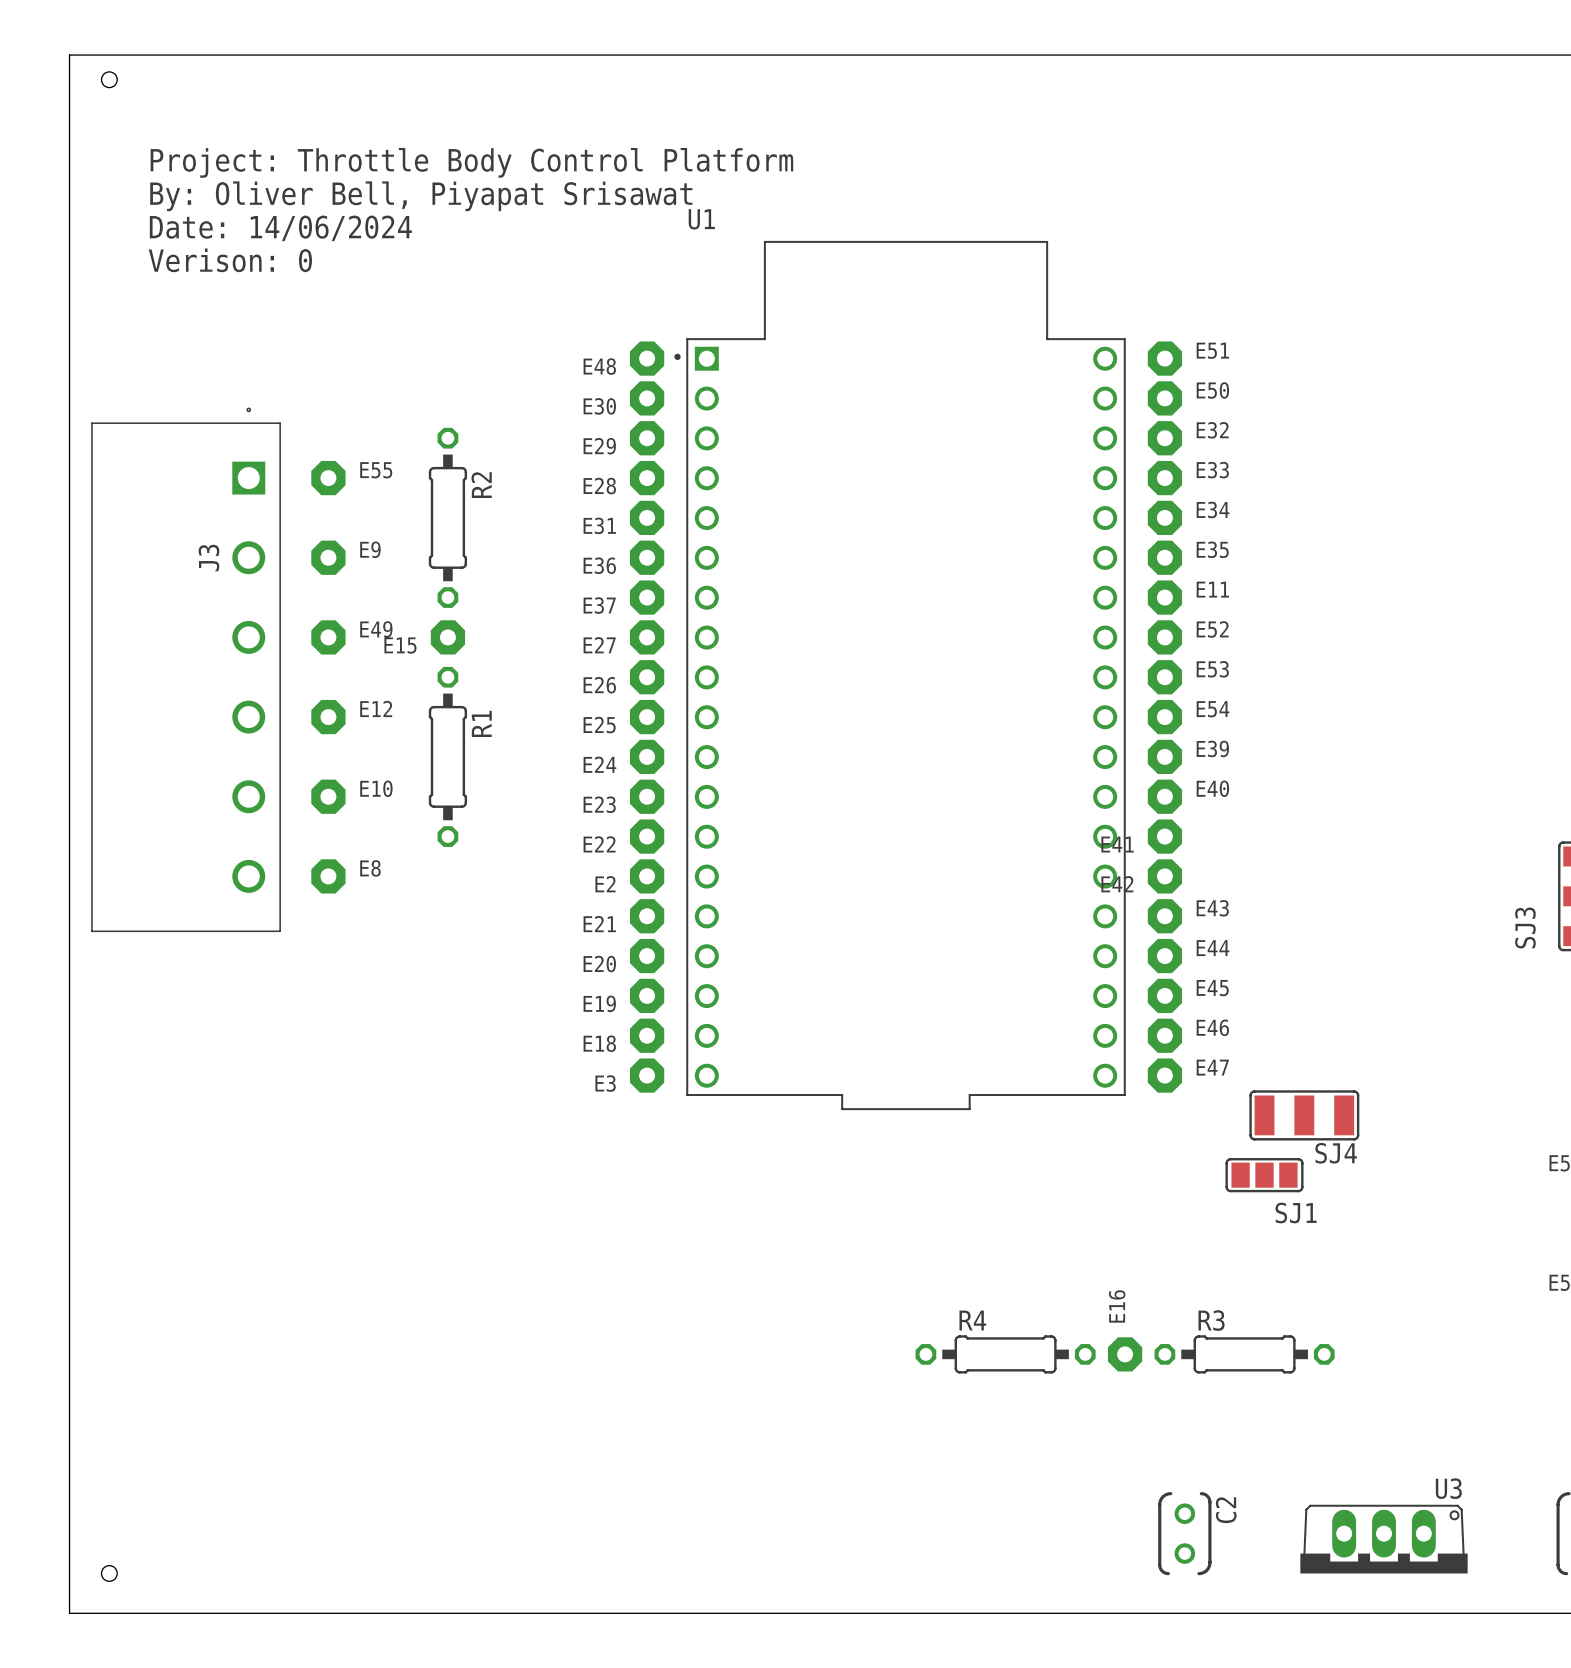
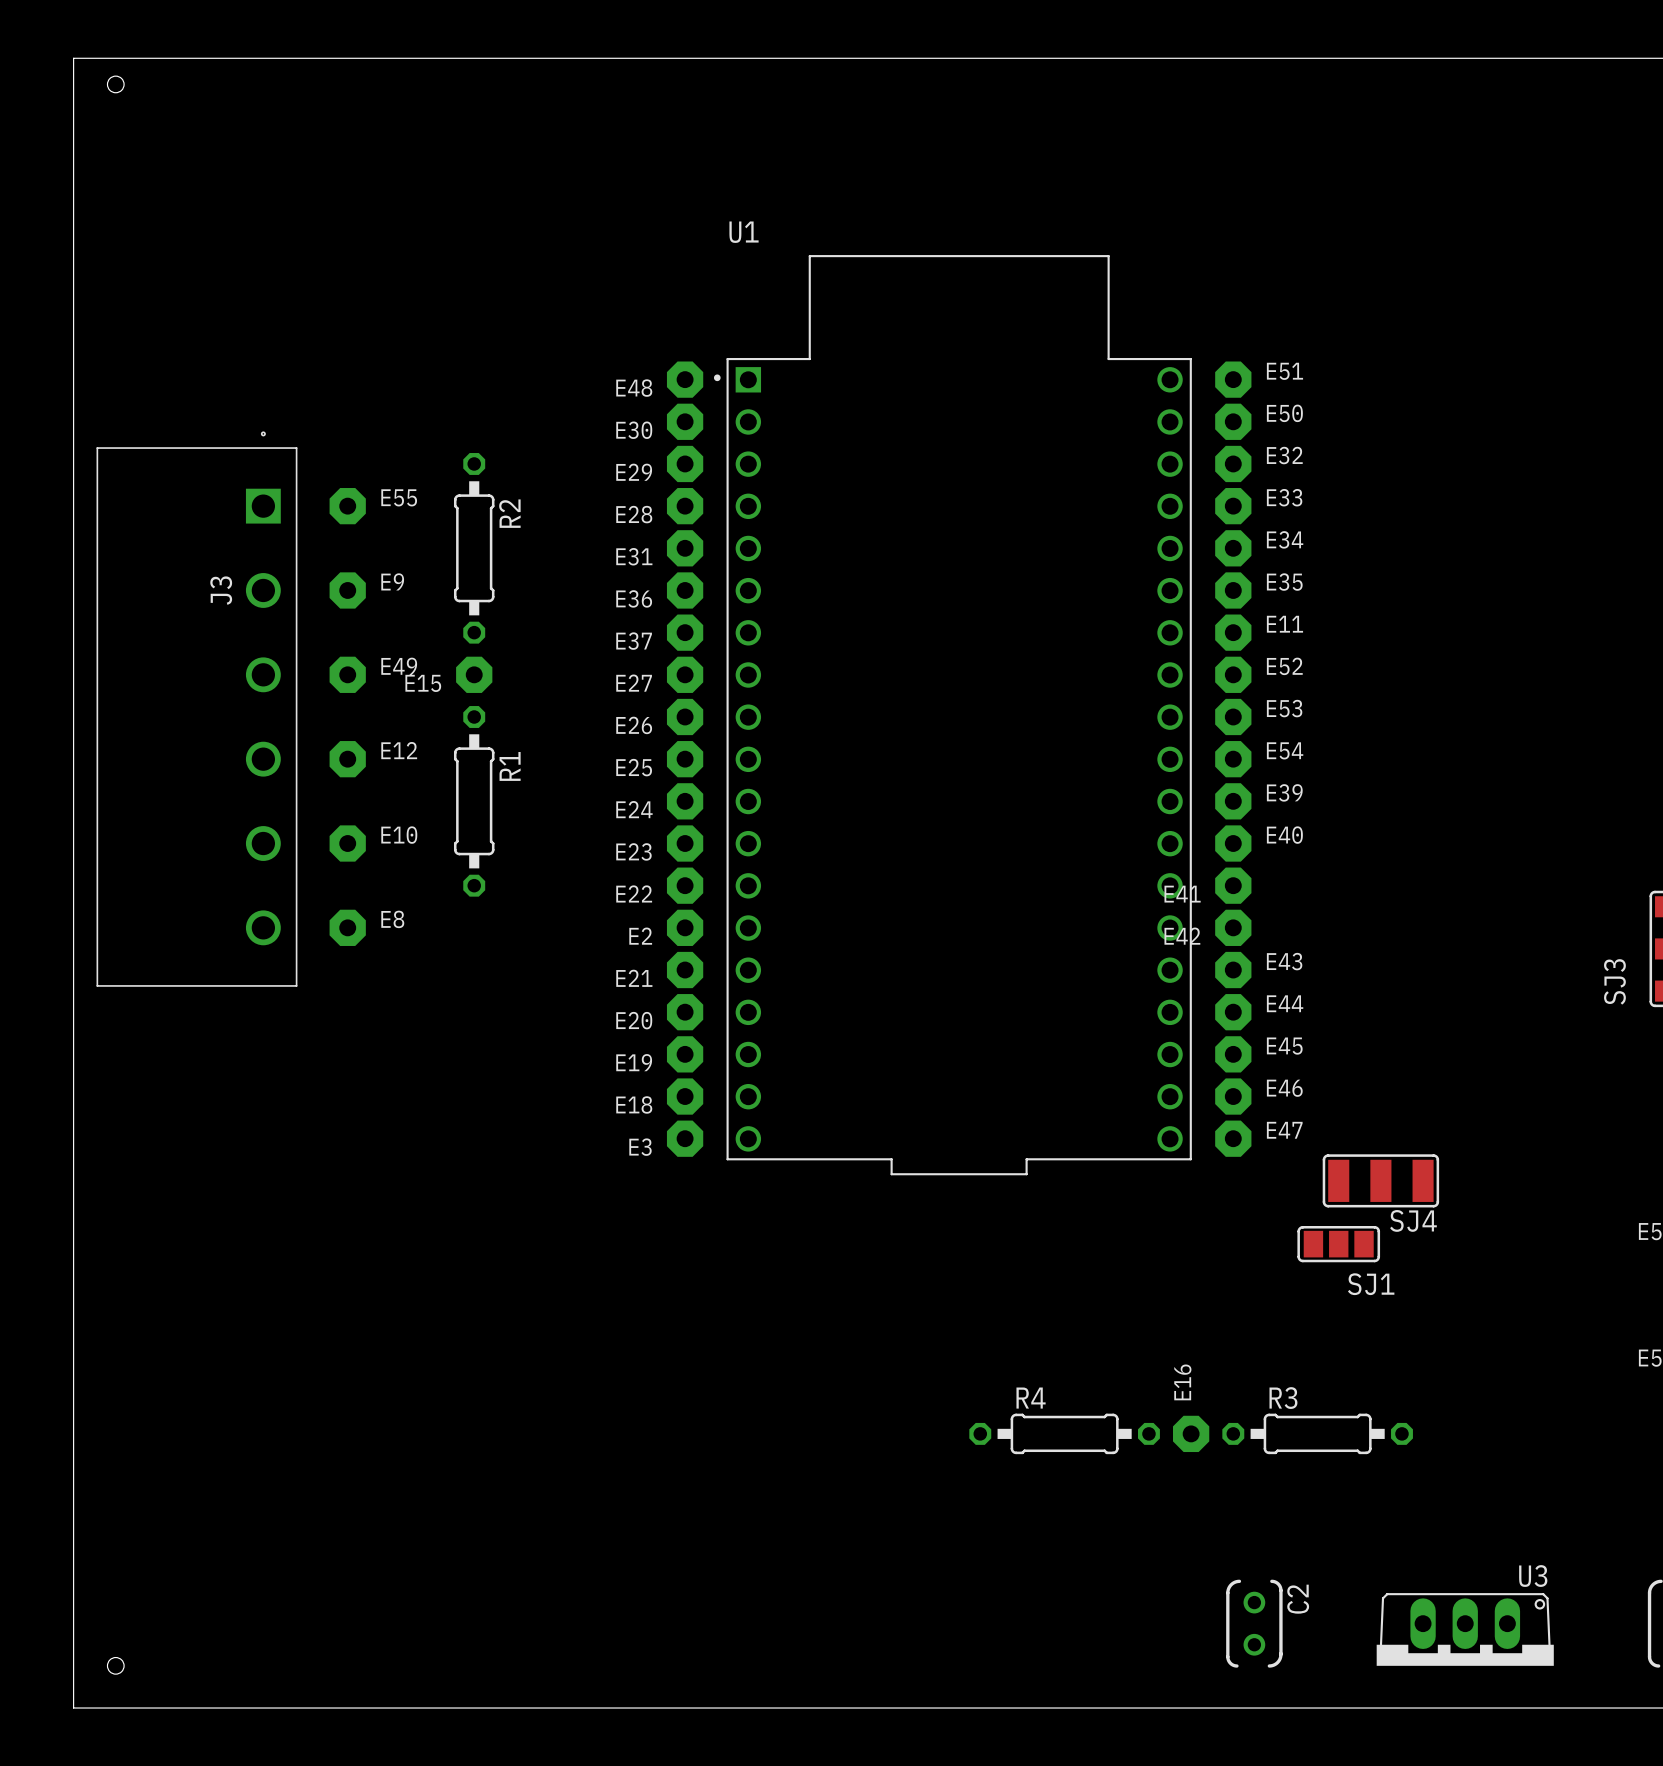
text: Project: Throttle Body Control Platform (471, 162) -> none
text: By: Oliver Bell, Piyapat Srisawat (421, 196) -> none
text: Date: 14/06/2024 (280, 228) -> none
text: Verison: 0 (230, 260) -> none

